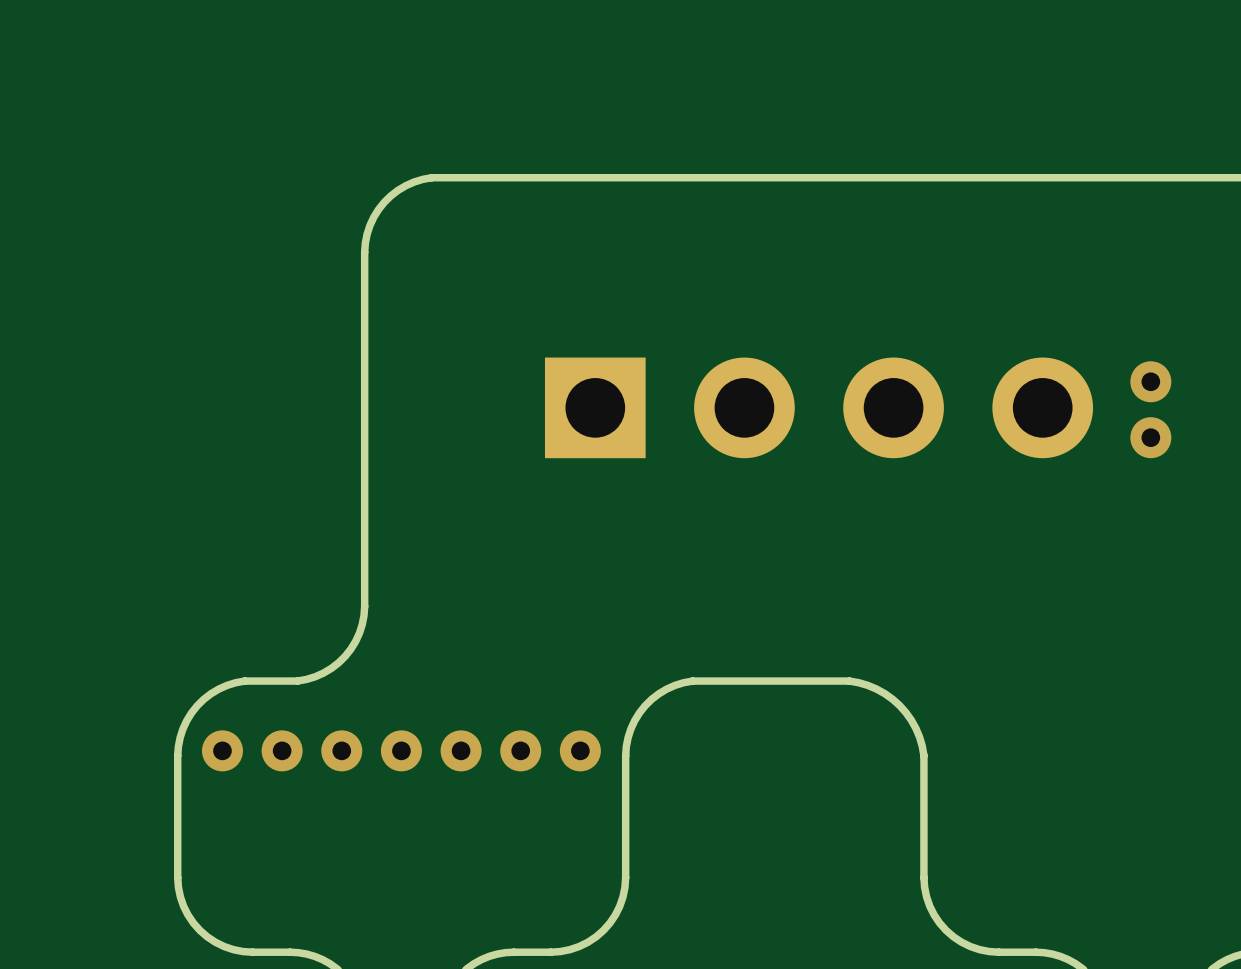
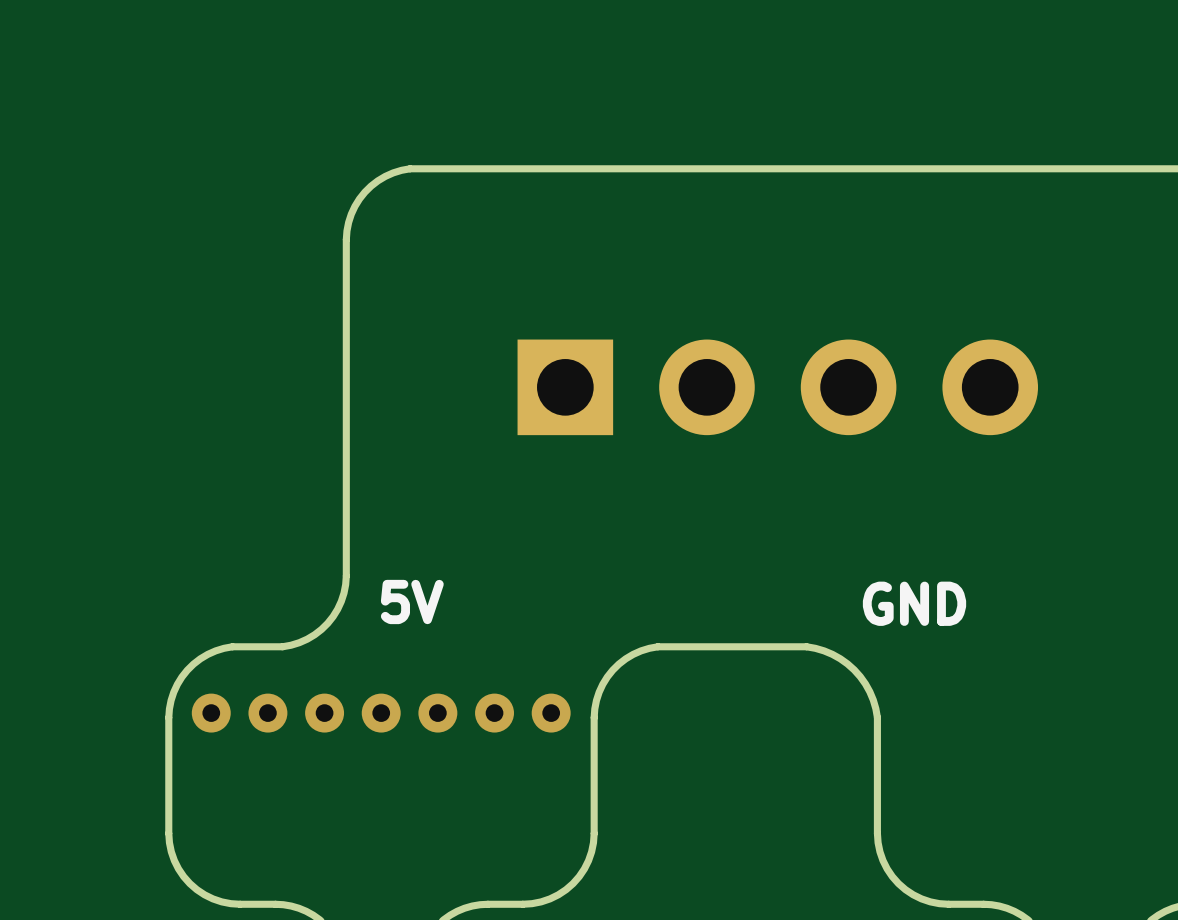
via: (1150, 381) -> none
via: (1150, 437) -> none
text: none -> 5V (412, 601)
text: none -> GND (914, 603)

